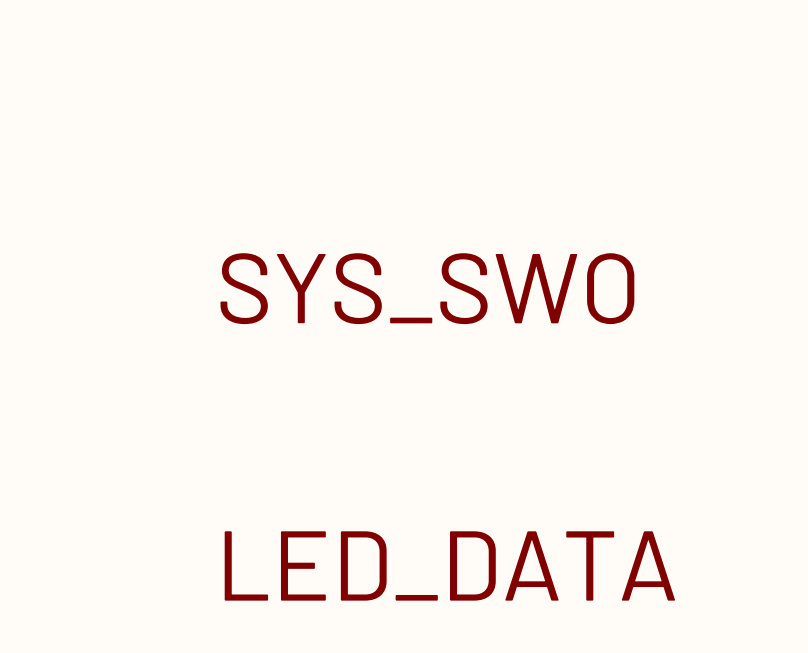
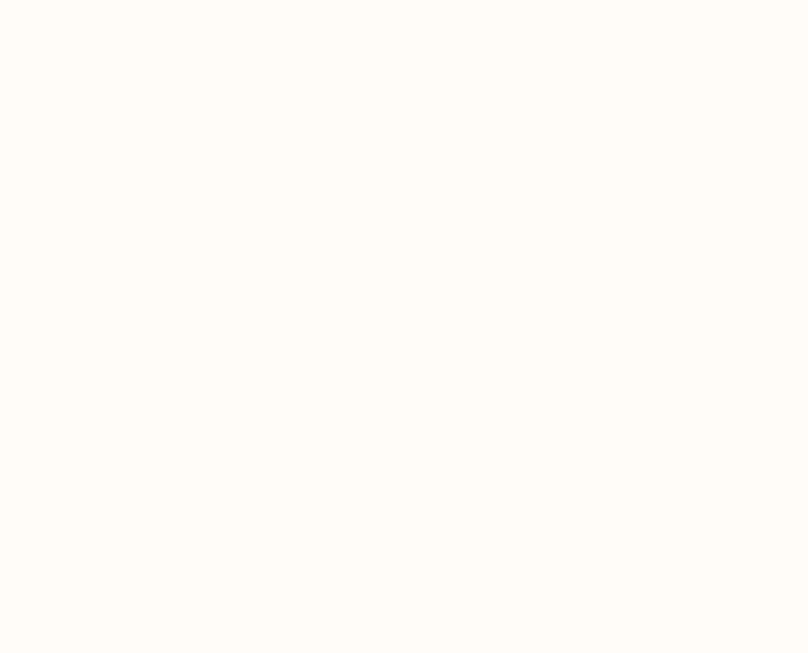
label: SYS_SWO (427, 288) -> none
label: LED_DATA (449, 565) -> none

